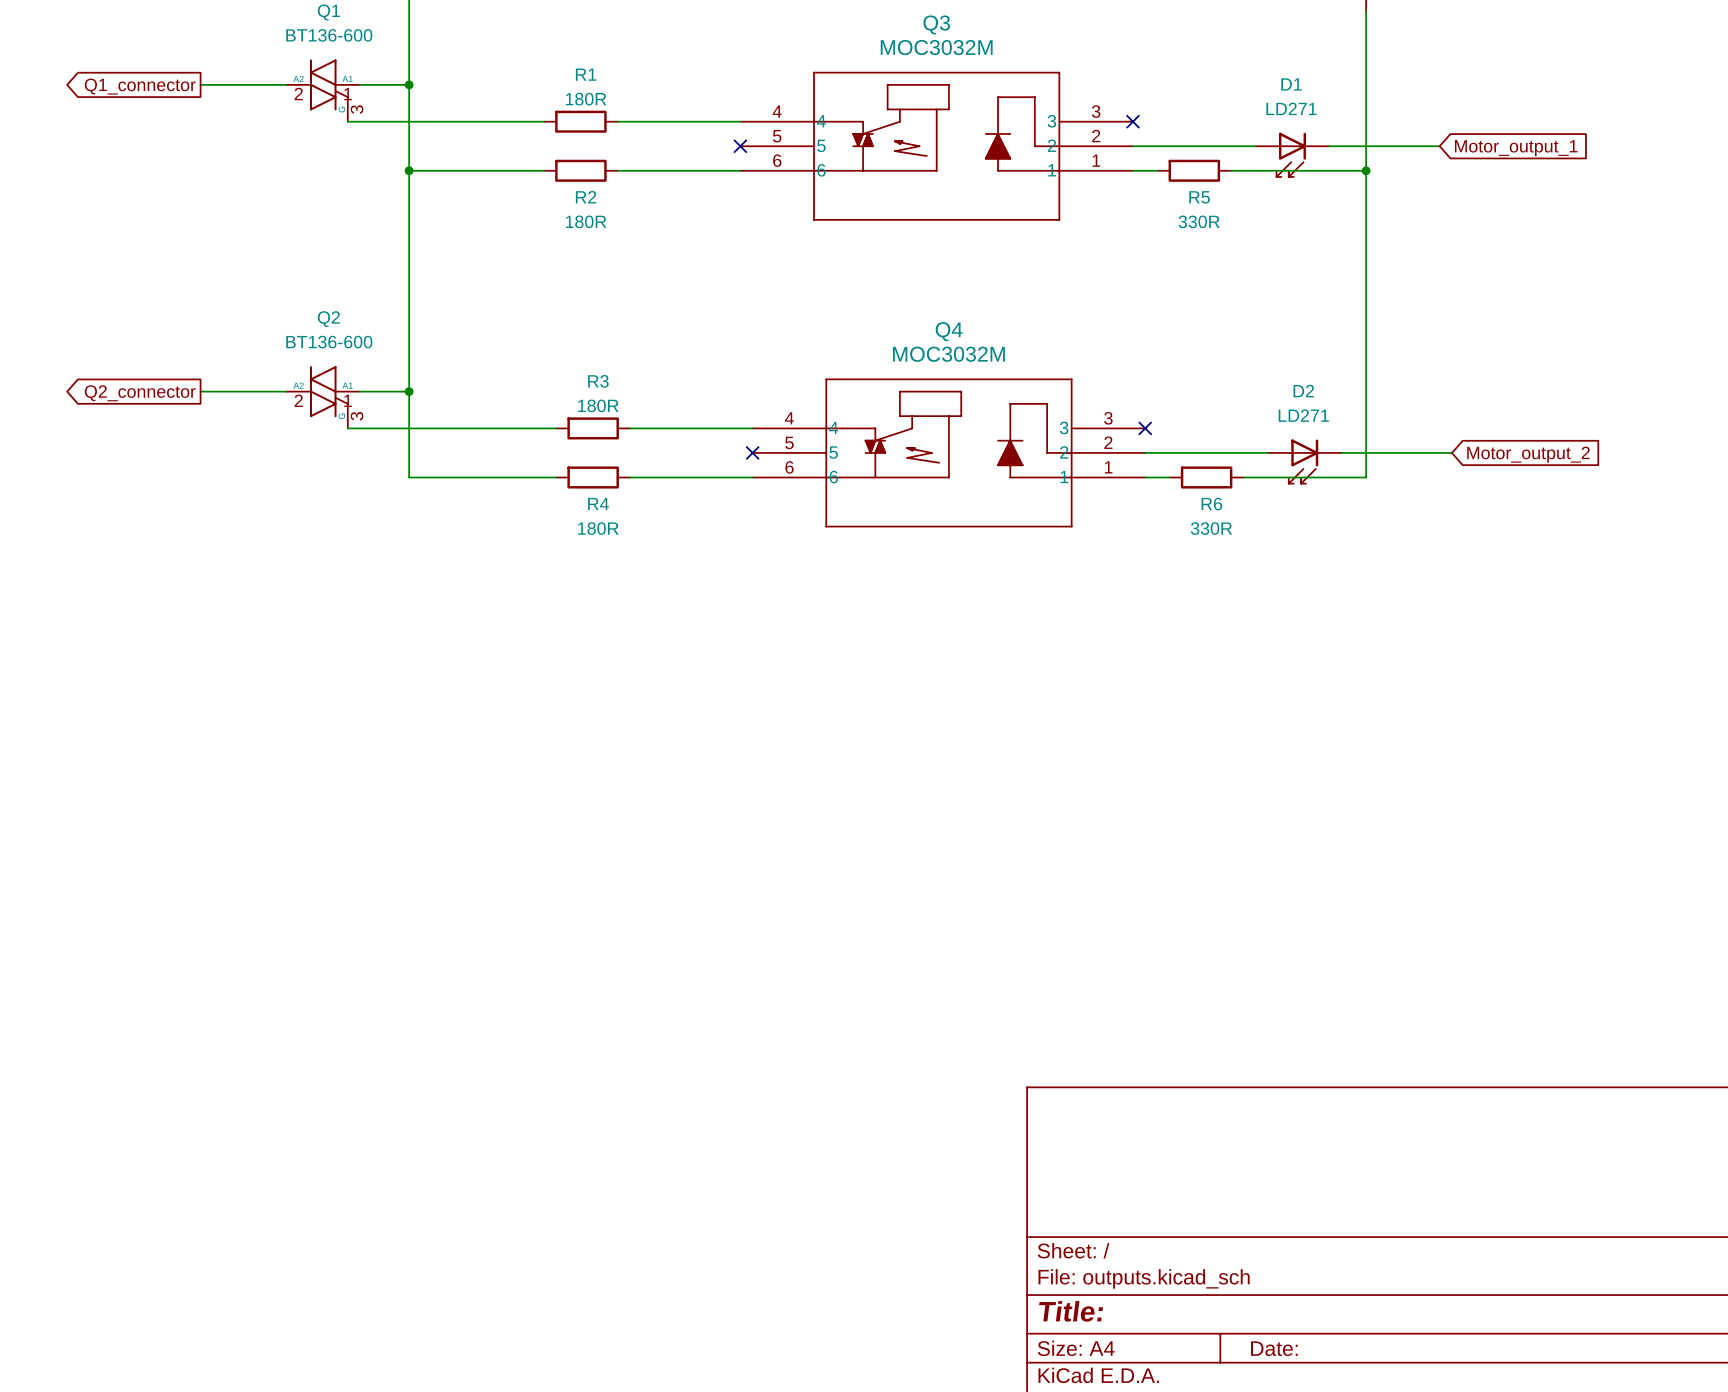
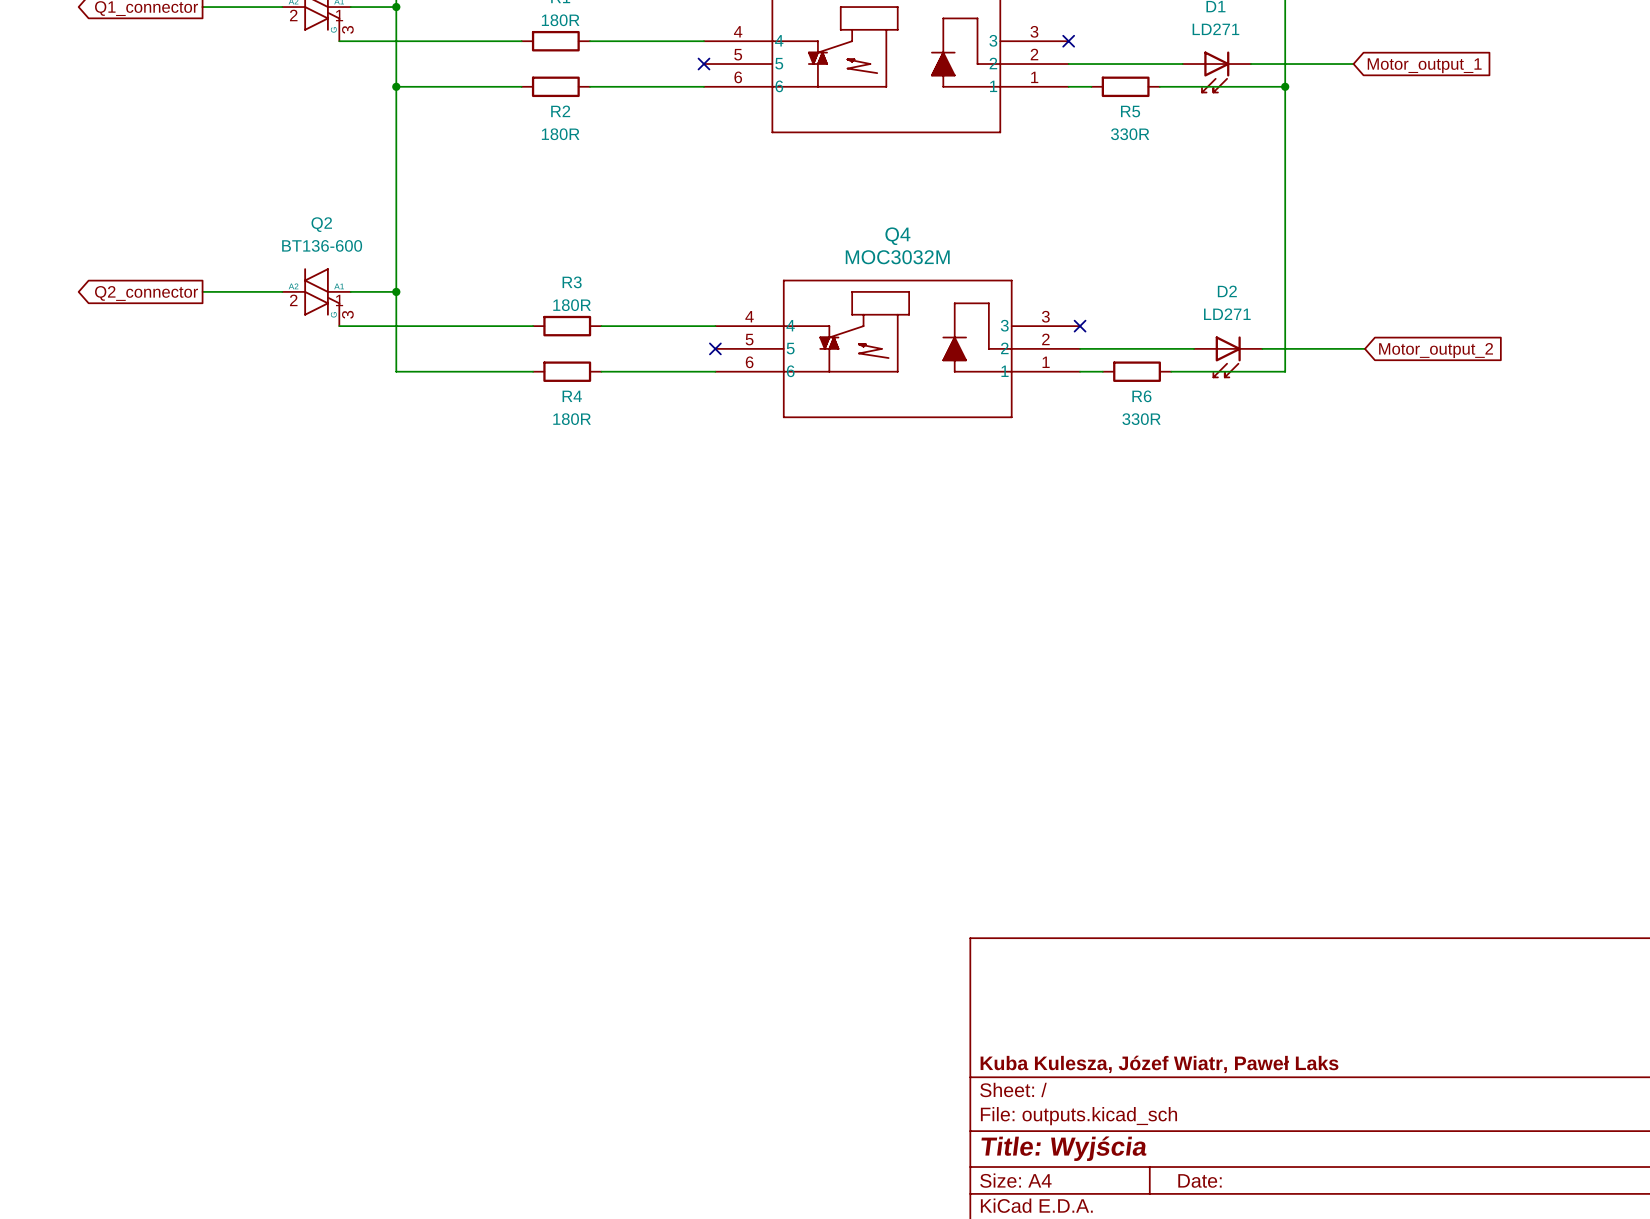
title block: none -> Kuba Kulesza, Józef Wiatr, Paweł Laks (1159, 1064)
title block: Title: (1071, 1311) -> Title: Wyjścia (1063, 1148)

